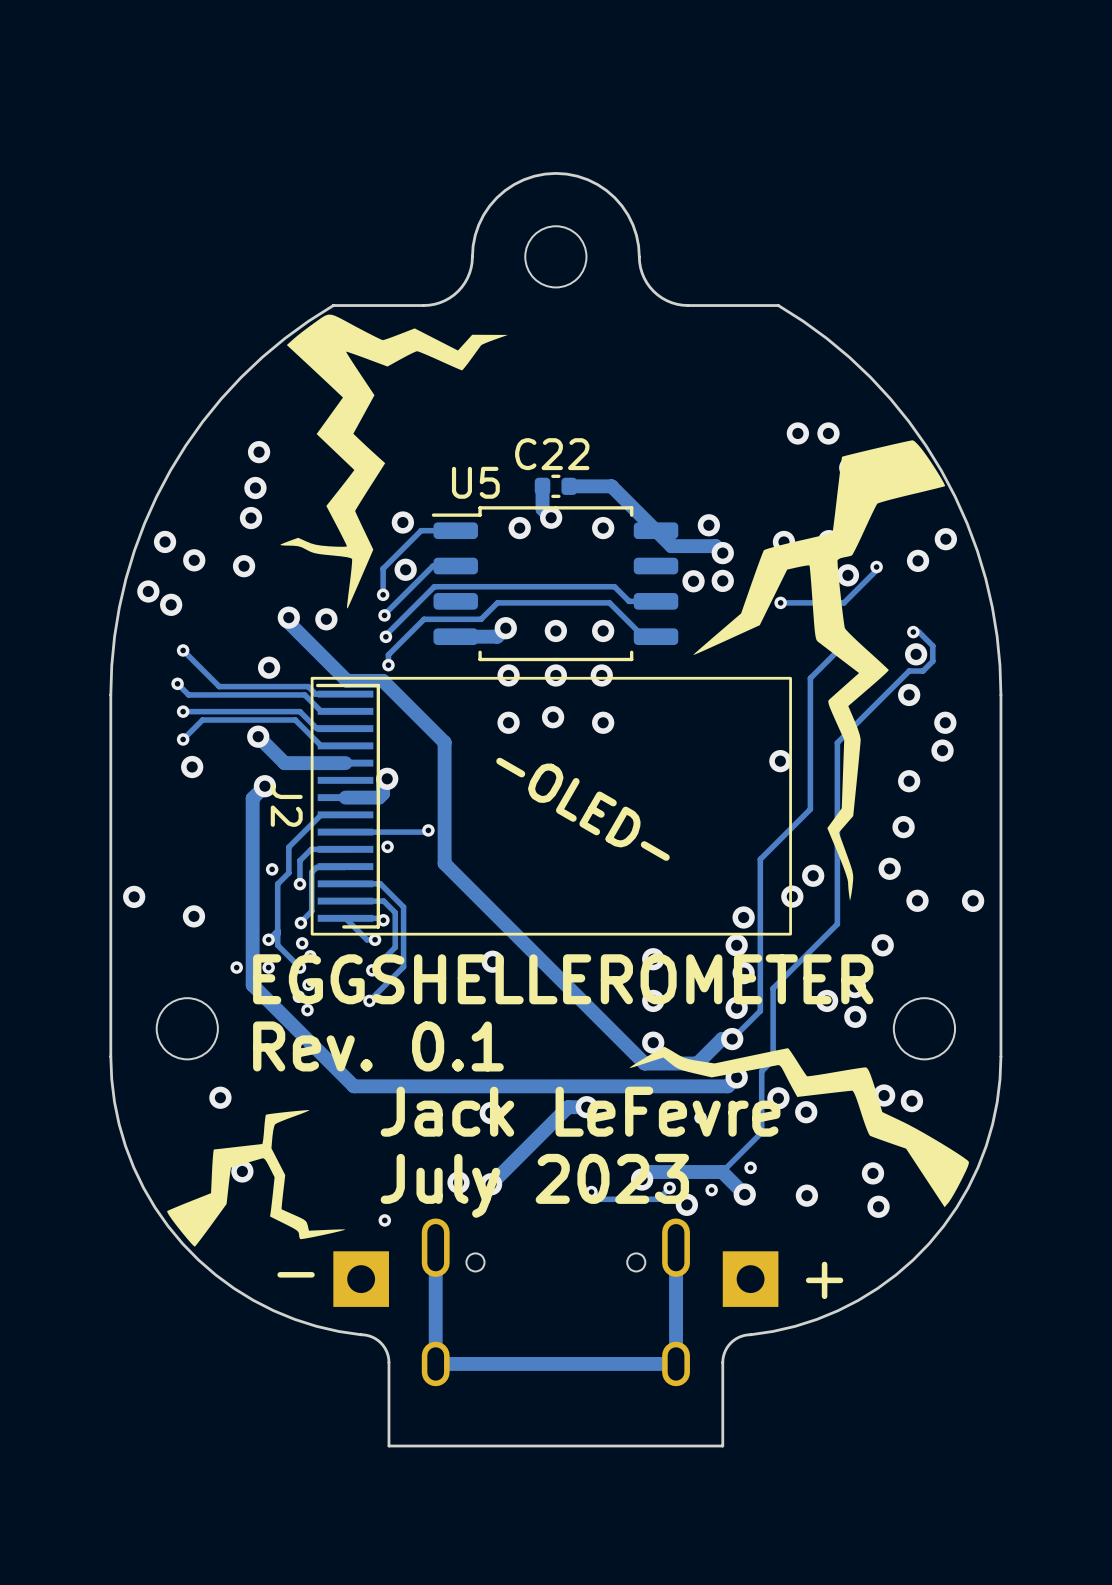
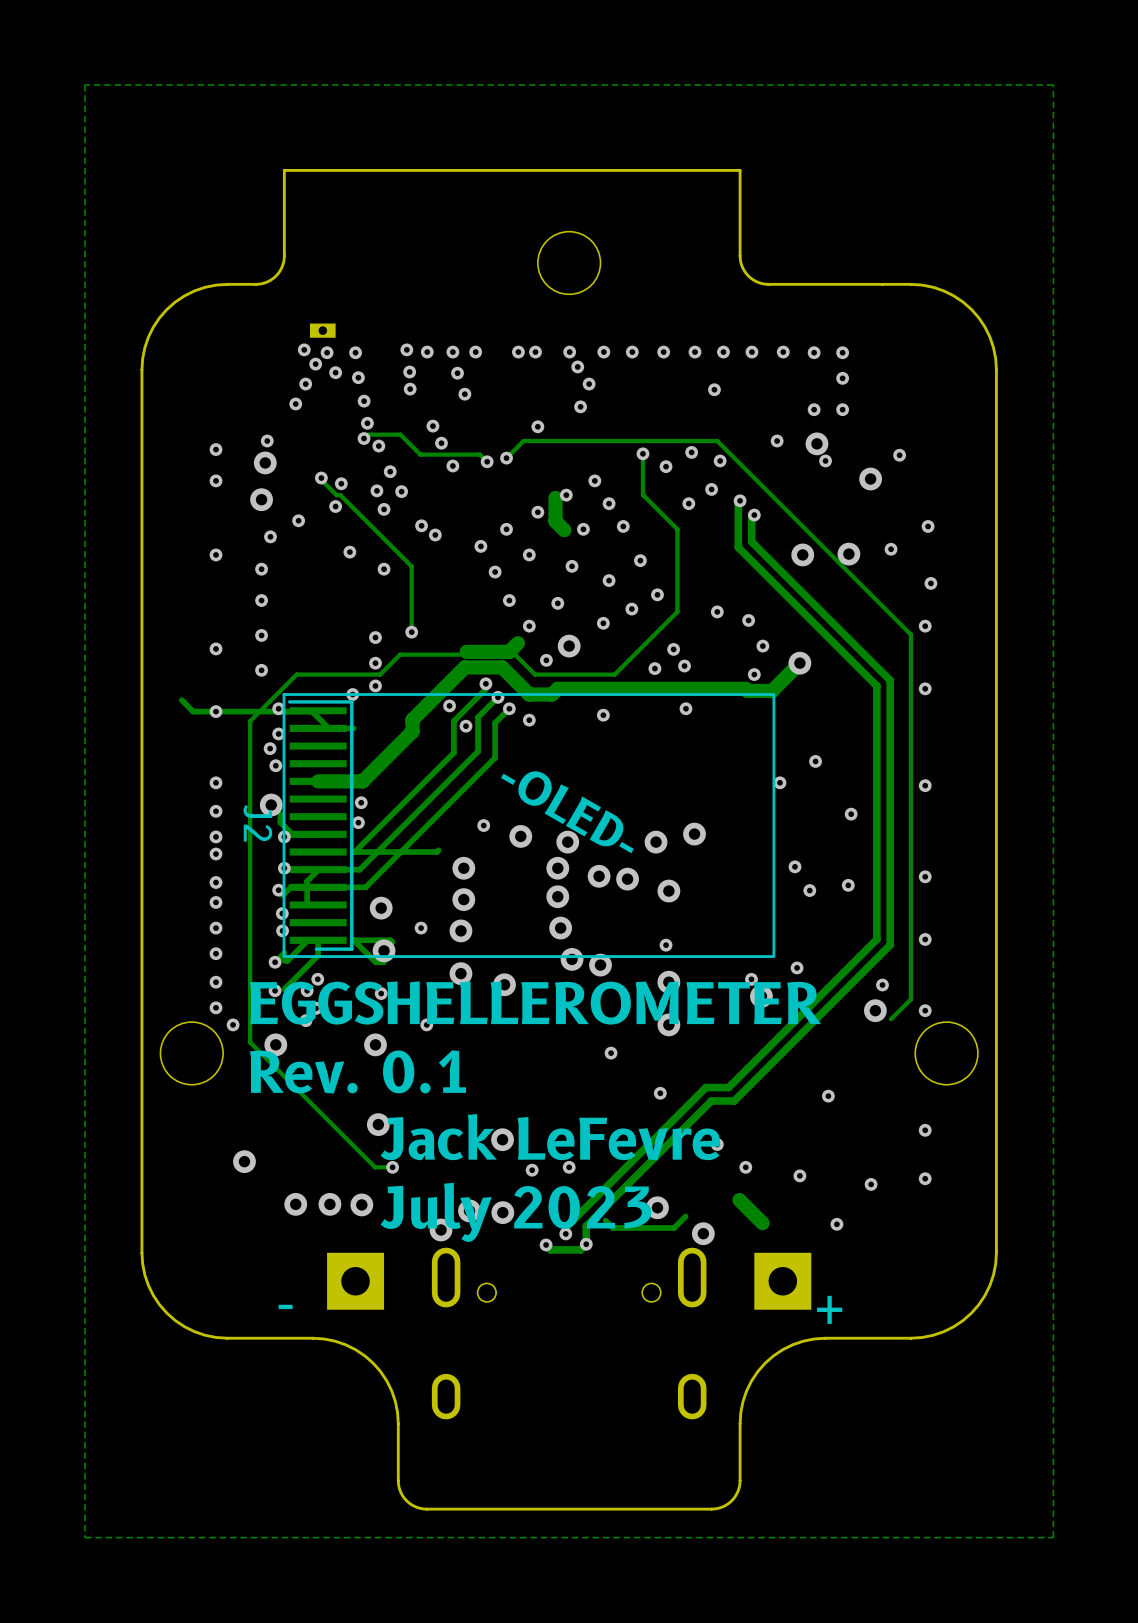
zone outline: none -> (1053, 84) (84, 84) (84, 1537) (1053, 1537) (1053, 84)
drawing: [167, 314, 969, 1247] -> none
part: none -> (322, 330)
via: none -> (304, 349)
via: none -> (406, 349)
via: none -> (427, 352)
via: none -> (452, 352)
via: none -> (475, 352)
via: none -> (518, 352)
via: none -> (535, 352)
via: none -> (569, 352)
via: none -> (603, 352)
via: none -> (632, 352)
via: none -> (663, 352)
via: none -> (695, 352)
via: none -> (723, 352)
via: none -> (751, 352)
via: none -> (783, 352)
via: none -> (327, 352)
via: none -> (355, 352)
via: none -> (814, 352)
via: none -> (842, 352)
via: none -> (315, 364)
via: none -> (577, 366)
via: none -> (335, 372)
via: none -> (409, 371)
via: none -> (457, 373)
via: none -> (358, 377)
via: none -> (842, 378)
via: none -> (305, 384)
via: none -> (589, 384)
via: none -> (410, 389)
via: none -> (714, 389)
via: none -> (464, 394)
via: none -> (364, 401)
via: none -> (295, 403)
via: none -> (580, 406)
via: none -> (814, 409)
via: none -> (842, 409)
via: none -> (367, 423)
via: none -> (432, 426)
via: none -> (537, 426)
track: none -> (364, 438) (367, 434) (400, 434) (420, 454) (479, 454) (487, 461)
via: none -> (364, 438)
via: none -> (267, 441)
via: none -> (777, 441)
via: none -> (441, 443)
via: (828, 433) -> none
via: none -> (378, 446)
via: none -> (215, 449)
via: none -> (691, 452)
track: none -> (642, 453) (643, 495)
via: none -> (642, 453)
via: none -> (899, 455)
track: none -> (506, 458) (523, 441) (717, 441) (910, 634) (910, 999) (891, 1019)
via: none -> (506, 458)
via: none -> (487, 461)
via: none -> (720, 460)
via: none -> (825, 460)
via: none -> (452, 465)
via: none -> (666, 466)
via: none -> (390, 471)
track: none -> (321, 478) (336, 495) (340, 495) (411, 566) (411, 632)
via: none -> (321, 478)
via: none -> (215, 480)
via: none -> (594, 480)
via: none -> (341, 483)
via: none -> (711, 489)
via: none -> (376, 490)
via: none -> (401, 491)
via: none -> (566, 495)
track: none -> (644, 495) (677, 529) (677, 611) (614, 674) (535, 674) (515, 654) (400, 654) (380, 674) (296, 674) (250, 721) (250, 1042) (375, 1167) (392, 1167)
C22: (555, 486) -> none
track: (569, 486) (611, 486) (671, 546) (715, 546) (722, 553) -> none
track: none -> (740, 500) (738, 502) (738, 547) (876, 685) (876, 939) (728, 1087) (705, 1087) (565, 1227) (565, 1233)
via: none -> (740, 500)
via: none -> (609, 503)
via: none -> (688, 503)
via: none -> (335, 506)
via: none -> (384, 509)
via: none -> (537, 512)
track: none -> (754, 515) (751, 517) (751, 541) (890, 680) (890, 945) (734, 1100) (711, 1100) (586, 1226) (586, 1244) (580, 1249) (551, 1249) (546, 1244)
via: none -> (754, 515)
via size: [239, 506, 263, 530] -> [264, 530, 277, 544]
via: none -> (298, 520)
via size: [391, 511, 415, 534] -> [415, 519, 428, 533]
via: none -> (928, 526)
via: none -> (506, 529)
via size: [508, 516, 531, 540] -> [522, 548, 536, 562]
via: none -> (583, 529)
via size: [592, 516, 615, 540] -> [616, 520, 630, 533]
via: (551, 517) -> none
via: none -> (435, 535)
via: (708, 525) -> none
track: (455, 530) (421, 530) (383, 568) (383, 594) -> none
via: none -> (480, 546)
via: none -> (891, 549)
via: none -> (349, 552)
via: (945, 539) -> none
via: (165, 541) -> none
via: none -> (215, 554)
via: none -> (640, 560)
via size: [906, 549, 930, 573] -> [924, 577, 938, 590]
via: none -> (572, 566)
via: (722, 553) -> none
via size: [232, 555, 256, 578] -> [255, 562, 268, 576]
via: none -> (384, 569)
via: none -> (495, 572)
via: (194, 560) -> none
track: (455, 566) (433, 566) (384, 615) -> none
via: none -> (609, 580)
track: (876, 567) (876, 570) (844, 602) (780, 602) -> none
via: (876, 567) -> none
via: (405, 569) -> none
via size: [682, 570, 705, 593] -> [710, 605, 724, 619]
via: (847, 575) -> none
via: none -> (657, 594)
via: (722, 580) -> none
U5: (555, 583) -> none
via: none -> (261, 600)
via: none -> (509, 600)
via: none -> (557, 603)
via: (148, 591) -> none
via: (383, 594) -> none
via: none -> (631, 609)
track: (656, 601) (629, 601) (614, 586) (434, 586) (385, 636) -> none
via: (780, 602) -> none
via: (171, 604) -> none
via: none -> (748, 620)
via: none -> (603, 623)
via: none -> (925, 626)
via: (384, 615) -> none
track: (288, 617) (288, 622) (347, 680) (383, 680) (444, 742) (444, 863) (644, 1063) (697, 1063) (721, 1039) (732, 1039) (760, 1010) (760, 859) (810, 809) (810, 678) (844, 644) -> none
via: (288, 617) -> none
via: none -> (411, 632)
via: (326, 619) -> none
via: none -> (261, 635)
via: none -> (375, 637)
via position: (505, 628) -> (529, 626)
via: (603, 630) -> none
via: none -> (762, 646)
track: (913, 632) (918, 632) (932, 645) (932, 661) (923, 671) (909, 671) (837, 742) (837, 924) (773, 988) (773, 1059) (761, 1071) (761, 1132) (722, 1172) (649, 1172) (642, 1179) -> none
via: (913, 632) -> none
via: none -> (215, 648)
via: none -> (673, 649)
via: (385, 636) -> none
track: (656, 636) (643, 636) (609, 602) (497, 602) (481, 619) (424, 619) (388, 654) (388, 665) -> none
via: none -> (546, 660)
via: none -> (375, 663)
track: none -> (799, 663) (772, 690) (747, 690) (745, 688) (557, 688) (552, 694) (529, 694) (502, 667) (464, 667) (412, 719) (412, 731) (362, 781) (353, 781)
via: none -> (799, 663)
track: (183, 650) (219, 686) (308, 686) (315, 694) (345, 694) -> none
via: (183, 650) -> none
via: none -> (684, 666)
via: none -> (654, 668)
via: (916, 654) -> none
via size: [257, 656, 281, 679] -> [255, 663, 268, 677]
via: none -> (754, 674)
via: (388, 665) -> none
track: none -> (485, 683) (485, 689) (453, 721) (453, 752) (354, 852)
via: none -> (485, 683)
via: none -> (375, 685)
via: none -> (925, 688)
via position: (508, 675) -> (509, 708)
via: (555, 675) -> none
via: (601, 675) -> none
via: none -> (352, 694)
track: none -> (497, 697) (478, 717) (478, 751) (359, 869) (353, 869)
via: none -> (497, 697)
via: (177, 683) -> none
via: none -> (449, 705)
via: none -> (278, 708)
track: none -> (509, 708) (495, 722) (495, 757) (365, 887) (290, 887) (282, 895)
via: none -> (685, 708)
via: none -> (215, 711)
via: (909, 694) -> none
via: none -> (603, 715)
via: none -> (529, 720)
via: none -> (465, 726)
track: (183, 711) (299, 711) (316, 728) (345, 728) -> none
via: (183, 711) -> none
via: none -> (278, 733)
via: (553, 717) -> none
via: (508, 722) -> none
via: (603, 722) -> none
via: (945, 722) -> none
via: none -> (270, 748)
track: (258, 736) (284, 763) (310, 763) -> none
via: (258, 736) -> none
track: (183, 739) (202, 719) (295, 719) (321, 745) (345, 745) -> none
via: (183, 739) -> none
via: none -> (815, 761)
via: none -> (275, 765)
via: (942, 750) -> none
via: (780, 761) -> none
via: none -> (215, 782)
via: none -> (779, 782)
via: (192, 767) -> none
via size: [898, 770, 921, 793] -> [918, 779, 932, 793]
track: (387, 778) (383, 782) (383, 793) (379, 797) (345, 797) -> none
via: (387, 778) -> none
via: none -> (361, 802)
track: (264, 786) (252, 798) (252, 985) (353, 1086) (727, 1086) (736, 1077) -> none
via: none -> (215, 811)
track: none -> (280, 814) (280, 822) (292, 834)
via: none -> (851, 814)
via: none -> (358, 822)
via: none -> (483, 825)
J2 position: (551, 806) -> (528, 825)
track: (345, 814) (321, 814) (288, 847) (288, 872) (277, 884) (277, 945) (299, 967) -> none
via: none -> (694, 834)
via: none -> (520, 836)
via: none -> (215, 836)
via: none -> (284, 836)
via: none -> (567, 842)
via: none -> (656, 842)
via: (903, 827) -> none
via: (428, 830) -> none
via: none -> (215, 854)
via: (387, 846) -> none
via: none -> (794, 866)
via: none -> (284, 868)
via: none -> (463, 868)
via: none -> (557, 868)
via: none -> (599, 876)
via size: [878, 857, 901, 880] -> [918, 870, 932, 884]
via: none -> (627, 879)
via: none -> (215, 882)
via size: [802, 864, 825, 887] -> [841, 878, 855, 892]
track: (345, 866) (316, 867) (311, 872) (311, 911) (300, 923) -> none
via: none -> (809, 890)
via: none -> (668, 891)
via: none -> (557, 896)
via: none -> (463, 899)
via: none -> (215, 902)
track: (345, 883) (380, 883) (403, 907) (403, 966) (369, 1000) -> none
via: (299, 884) -> none
via: none -> (381, 908)
via: none -> (282, 913)
via: (134, 896) -> none
via: (792, 896) -> none
via position: (917, 900) -> (925, 939)
via: (973, 900) -> none
track: (345, 901) (383, 901) (395, 912) (395, 947) (372, 970) -> none
via: none -> (215, 928)
via: none -> (421, 928)
via: none -> (560, 928)
via: none -> (282, 930)
via: none -> (460, 930)
via: (193, 916) -> none
via: (743, 917) -> none
via: (383, 920) -> none
via: (300, 923) -> none
via: none -> (666, 945)
via: none -> (384, 950)
via: none -> (215, 953)
via size: [725, 934, 748, 957] -> [745, 972, 758, 986]
via: none -> (572, 959)
track: none -> (284, 960) (287, 960) (307, 940) (318, 940) (318, 955) (284, 989)
via: (375, 939) -> none
via: none -> (600, 965)
via: (302, 943) -> none
via: none -> (797, 967)
via: (882, 945) -> none
via: none -> (460, 973)
via: none -> (215, 982)
via: none -> (882, 985)
via: (236, 967) -> none
via: none -> (215, 1007)
via: none -> (925, 1010)
via: none -> (233, 1024)
via: (369, 1000) -> none
via: none -> (426, 1024)
via: (827, 1000) -> none
via: (736, 1007) -> none
via: (307, 1010) -> none
via: (855, 1016) -> none
via: none -> (275, 1044)
via: none -> (375, 1044)
via: none -> (611, 1053)
via: (732, 1039) -> none
via: (653, 1042) -> none
via: none -> (660, 1093)
via: none -> (828, 1096)
via: (736, 1077) -> none
via size: [900, 1089, 924, 1113] -> [918, 1123, 932, 1137]
via: (884, 1095) -> none
via: (220, 1097) -> none
via: none -> (378, 1124)
via: (778, 1098) -> none
track: (586, 1107) (568, 1107) (491, 1184) -> none
via: (586, 1107) -> none
via: (806, 1112) -> none
via: none -> (244, 1161)
via: none -> (392, 1167)
via: none -> (569, 1167)
via: none -> (745, 1167)
via: none -> (532, 1170)
via: none -> (799, 1175)
via: none -> (925, 1178)
via: none -> (871, 1184)
via: (750, 1167) -> none
via: (242, 1171) -> none
via: (872, 1173) -> none
via: none -> (295, 1204)
via: none -> (329, 1204)
via: none -> (361, 1204)
via size: [795, 1184, 819, 1207] -> [830, 1217, 844, 1231]
via: (669, 1188) -> none
via: (711, 1190) -> none
via: (591, 1192) -> none
via: (744, 1194) -> none
via: none -> (441, 1229)
via: none -> (565, 1233)
via: (878, 1206) -> none
via: none -> (546, 1244)
via: none -> (586, 1244)
via: (384, 1220) -> none
track: (676, 1247) (676, 1363) (435, 1363) (435, 1247) -> none
part position: (361, 1279) -> (355, 1281)
part position: (750, 1279) -> (782, 1281)
board edge: (722, 1390) (723, 1356) (727, 1347) (735, 1339) (744, 1335) (795, 1326) (838, 1310) (877, 1288) (913, 1259) (943, 1226) (956, 1207) (968, 1187) (986, 1146) (997, 1101) (1000, 1056) (1000, 694) (997, 636) (985, 578) (967, 523) (955, 496) (926, 445) (909, 421) (870, 377) (826, 338) (778, 305) (682, 305) (662, 298) (649, 287) (644, 277) (640, 267) (636, 235) (622, 206) (597, 184) (577, 176) (555, 173) (534, 176) (514, 184) (489, 206) (475, 235) (471, 267) (467, 277) (461, 287) (449, 298) (429, 305) (333, 305) (284, 338) (241, 377) (202, 421) (170, 470) (156, 496) (134, 550) (125, 578) (114, 636) (110, 694) (110, 1056) (114, 1101) (125, 1146) (133, 1167) (155, 1207) (168, 1226) (198, 1259) (234, 1288) (273, 1310) (316, 1326) (367, 1335) (375, 1339) (384, 1347) (388, 1356) (388, 1390) -> (740, 1423) (742, 1401) (751, 1380) (765, 1363) (782, 1349) (814, 1338) (910, 1338) (943, 1331) (971, 1313) (984, 1295) (993, 1274) (996, 1252) (996, 369) (989, 337) (978, 317) (963, 302) (933, 287) (910, 284) (768, 284) (753, 279) (744, 271) (740, 259) (740, 170) (284, 170) (284, 259) (278, 273) (271, 279) (262, 283) (216, 285) (184, 295) (159, 317) (148, 337) (142, 358) (142, 1263) (148, 1285) (159, 1304) (175, 1320) (194, 1331) (227, 1338) (323, 1338) (355, 1349) (373, 1363) (386, 1380) (395, 1401) (398, 1423)
board edge: (722, 1446) (388, 1446) -> (740, 1480) (737, 1493) (731, 1500) (723, 1506) (711, 1509) (423, 1508) (414, 1506) (406, 1500) (399, 1490) (398, 1480)

